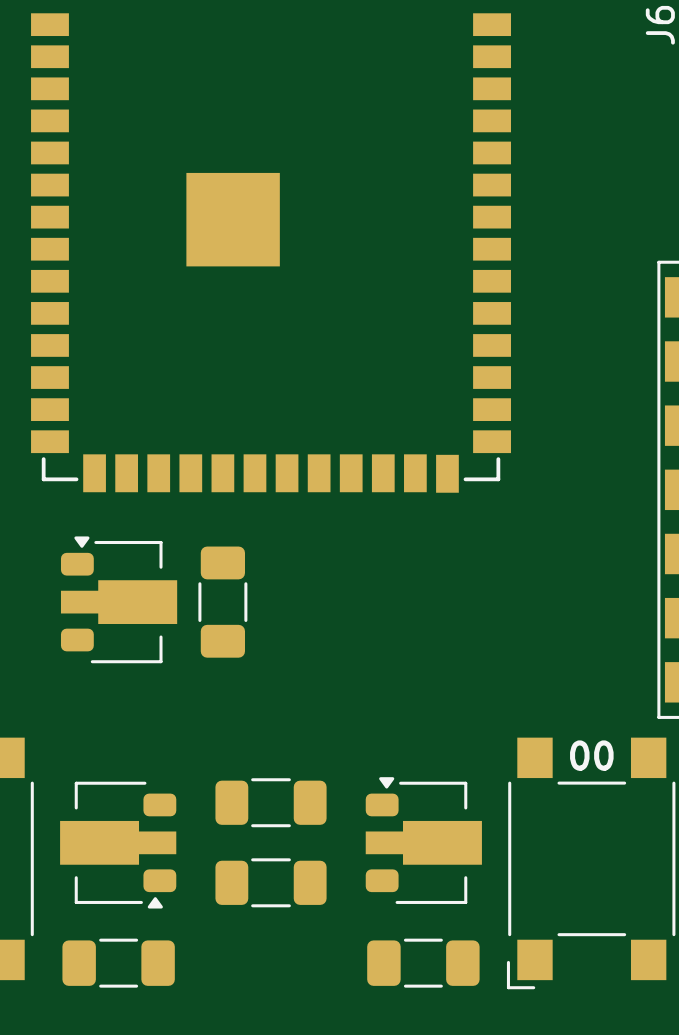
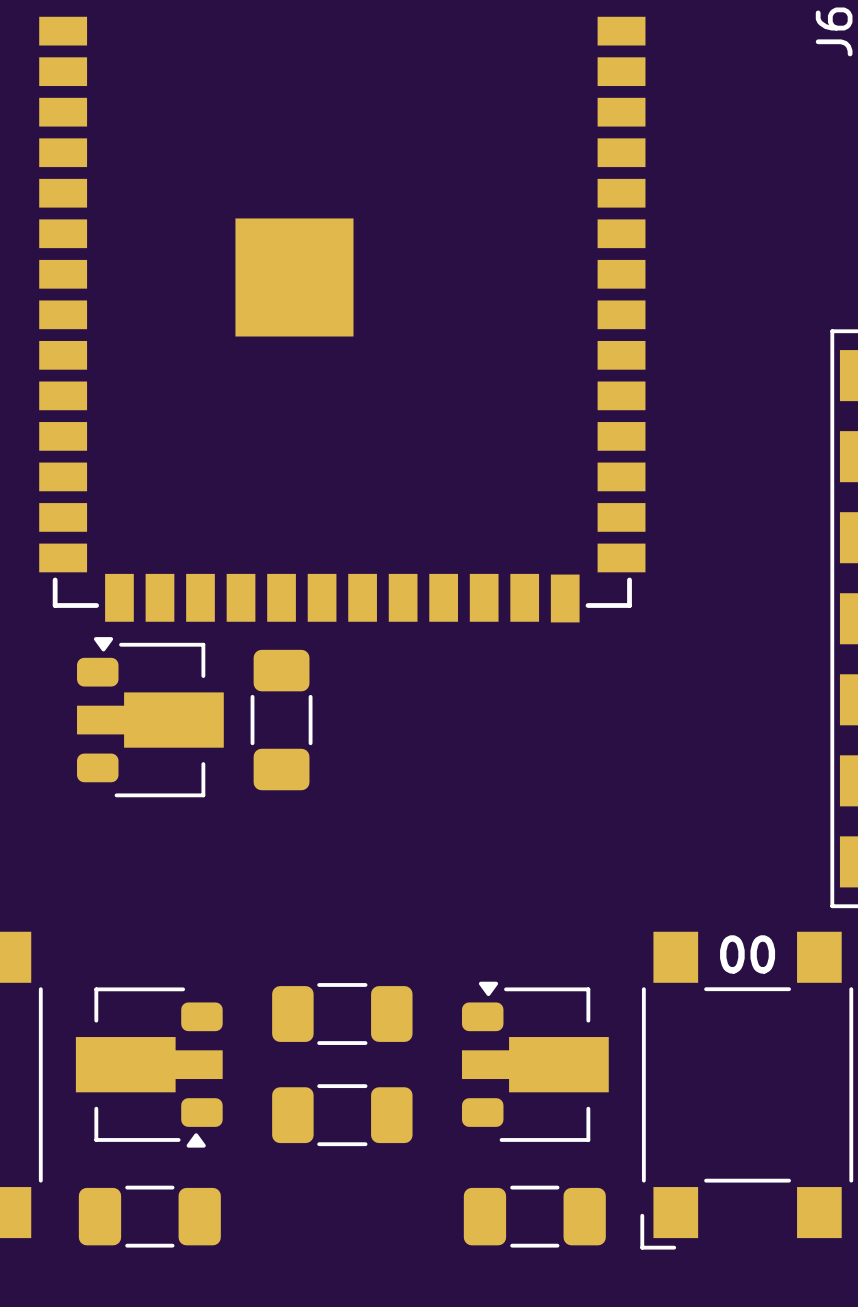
part position: (119, 599) -> (150, 717)
part position: (222, 602) -> (281, 720)

